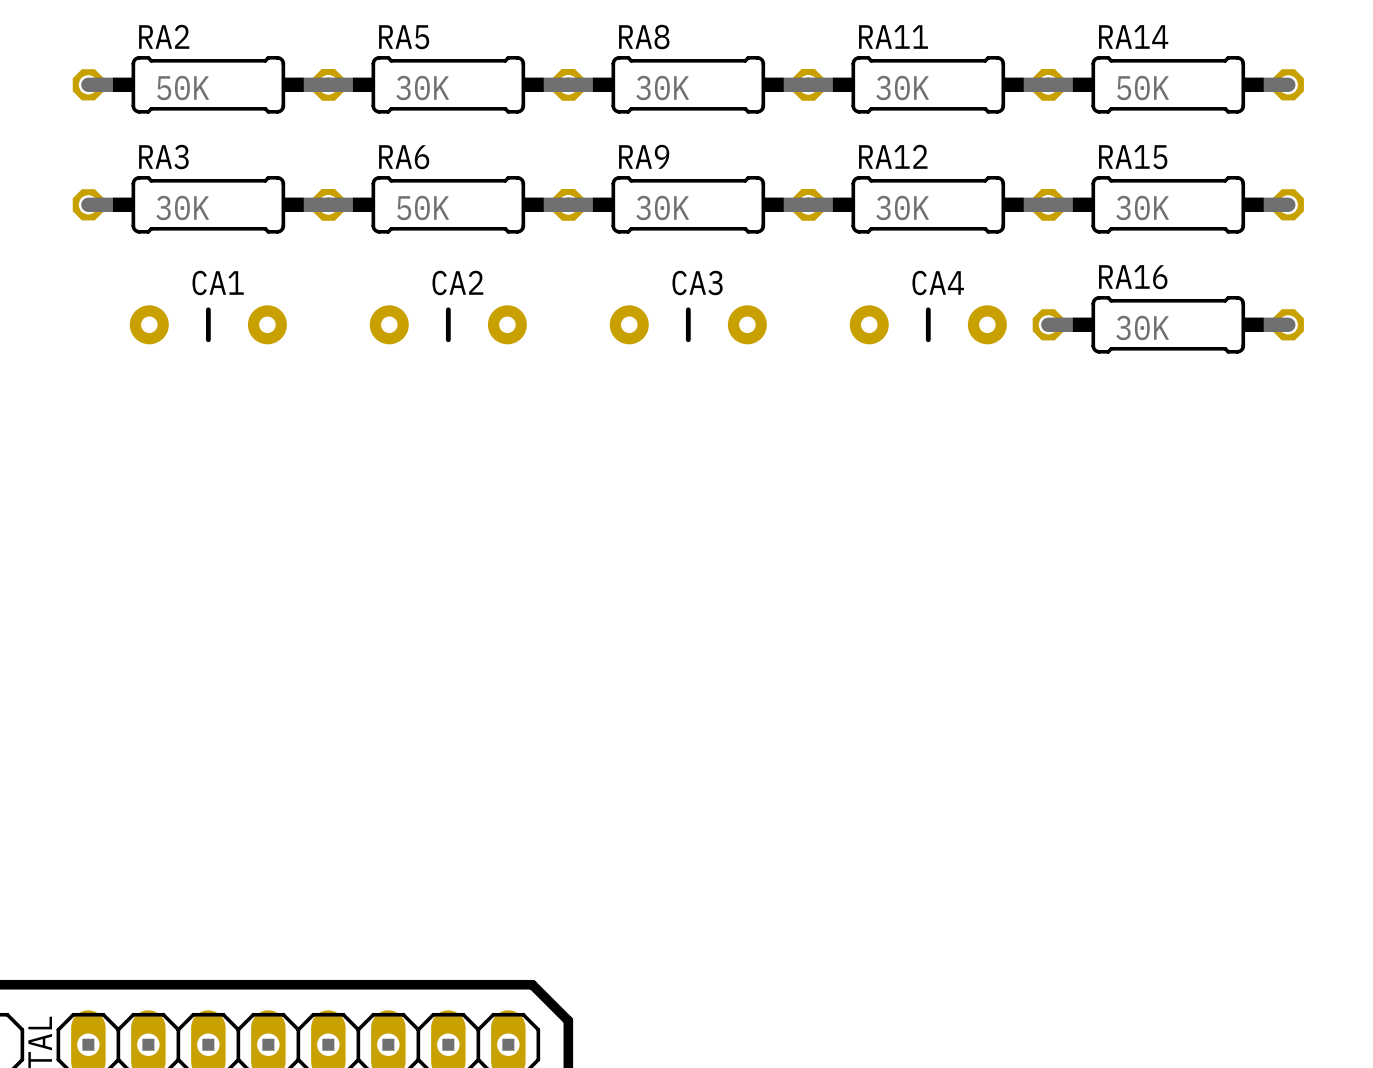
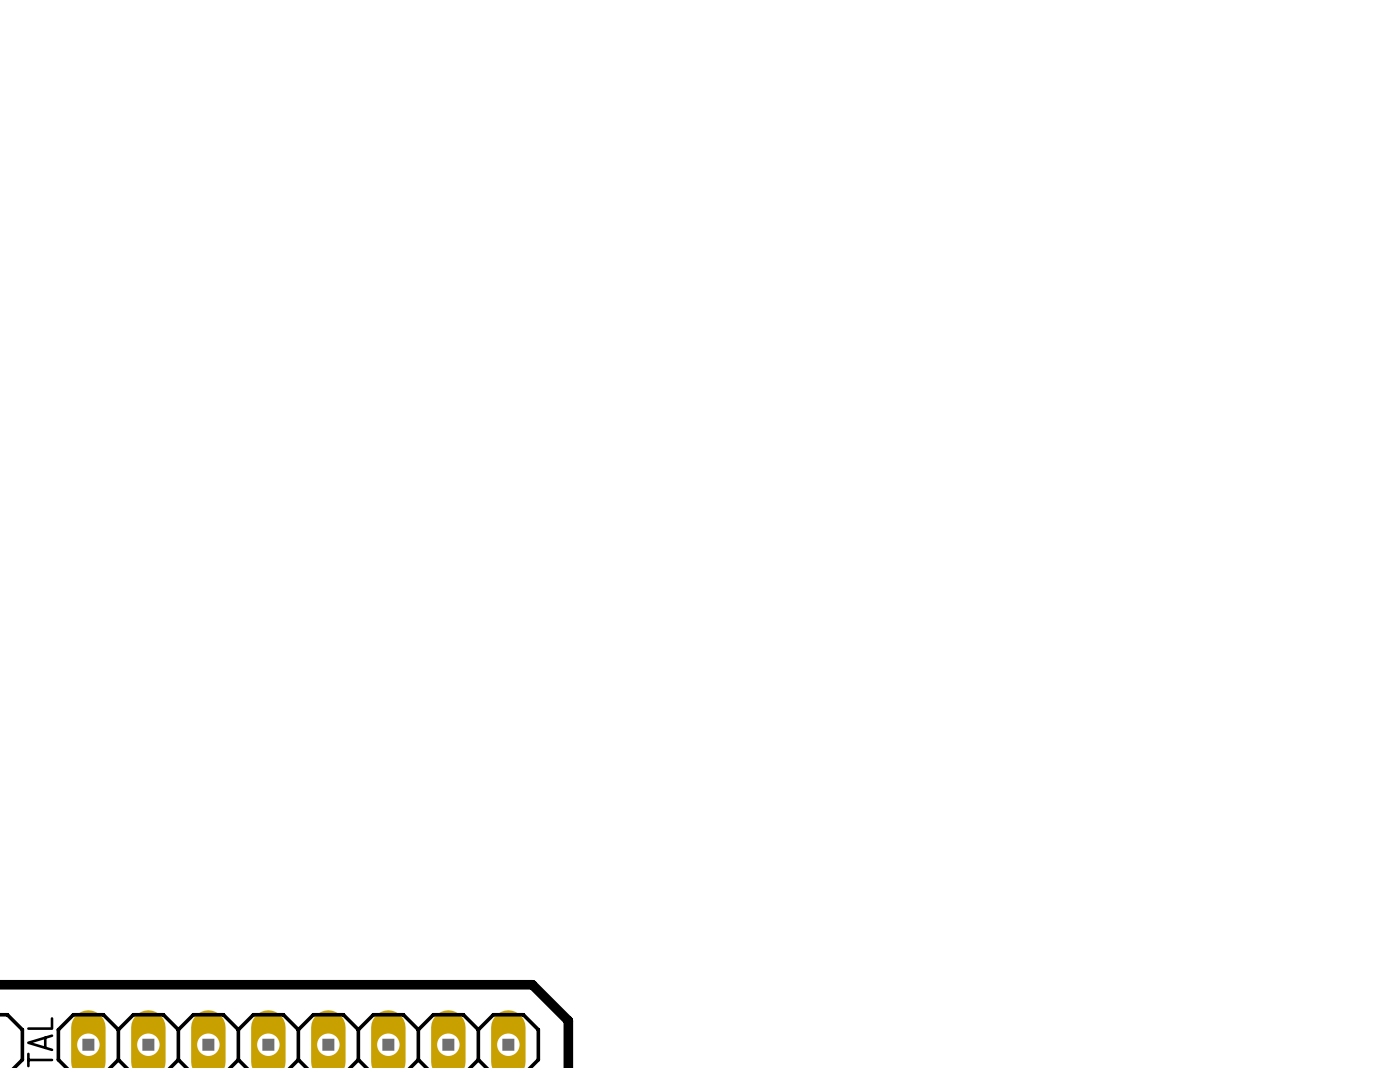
RA2: 50K (208, 84) -> none
RA5: 30K (448, 84) -> none
RA8: 30K (688, 84) -> none
RA11: 30K (928, 84) -> none
RA14: 50K (1168, 84) -> none
RA3: 30K (208, 204) -> none
RA6: 50K (448, 204) -> none
RA9: 30K (688, 204) -> none
RA12: 30K (928, 204) -> none
RA15: 30K (1168, 204) -> none
CA1: (208, 324) -> none
CA2: (448, 324) -> none
CA3: (688, 324) -> none
CA4: (928, 324) -> none
RA16: 30K (1168, 324) -> none

